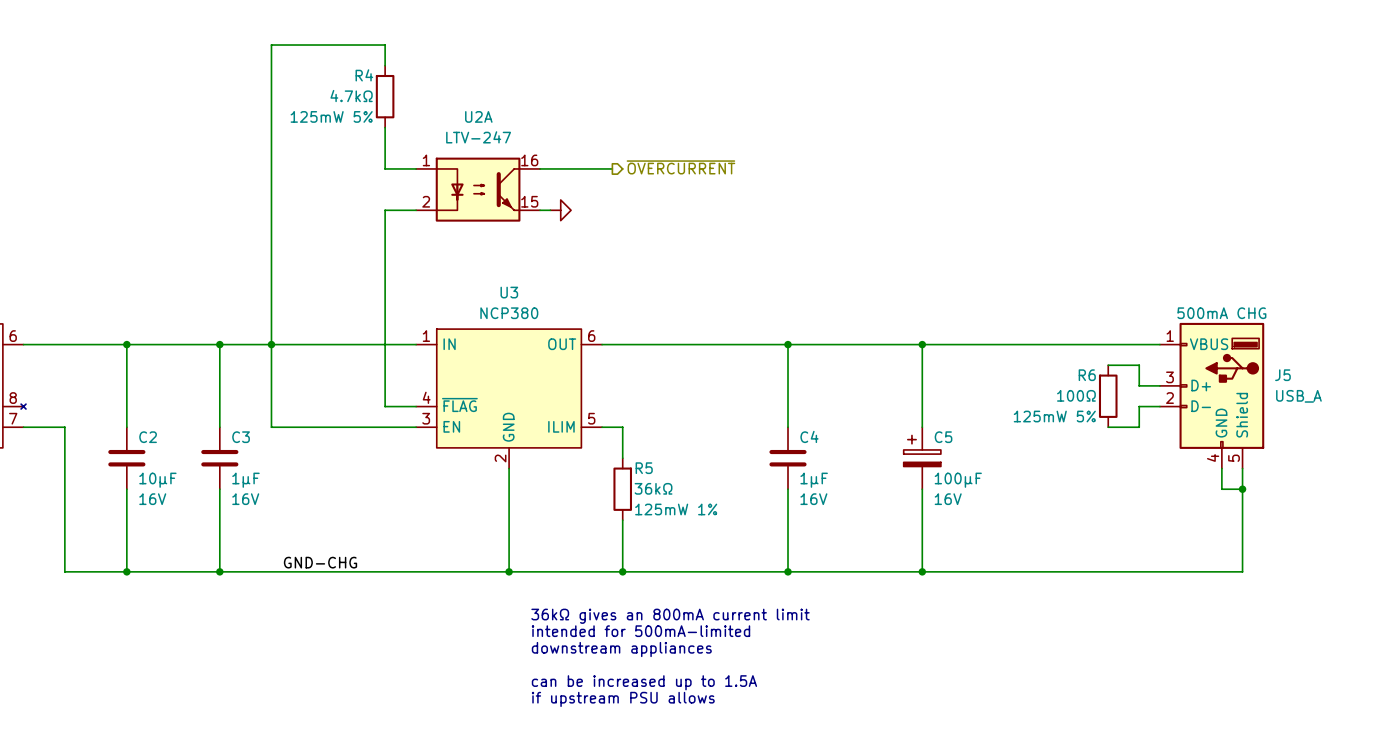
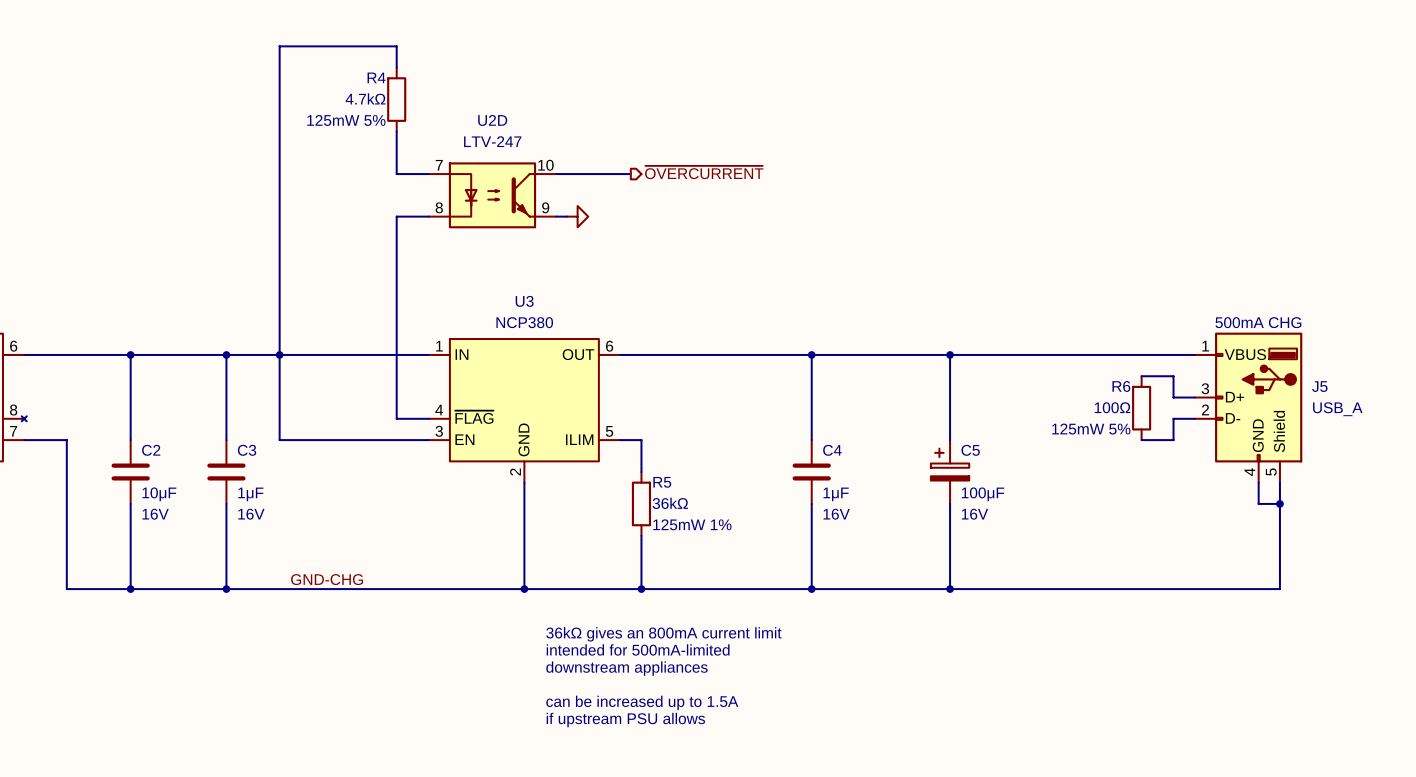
U2A name: U2A (478, 116) -> U2D (492, 120)
U2A pin number: 1 (426, 160) -> 7 (439, 165)
U2A pin number: 16 (529, 160) -> 10 (545, 165)
U2A pin number: 2 (426, 201) -> 8 (439, 207)
U2A pin number: 15 (529, 201) -> 9 (545, 207)

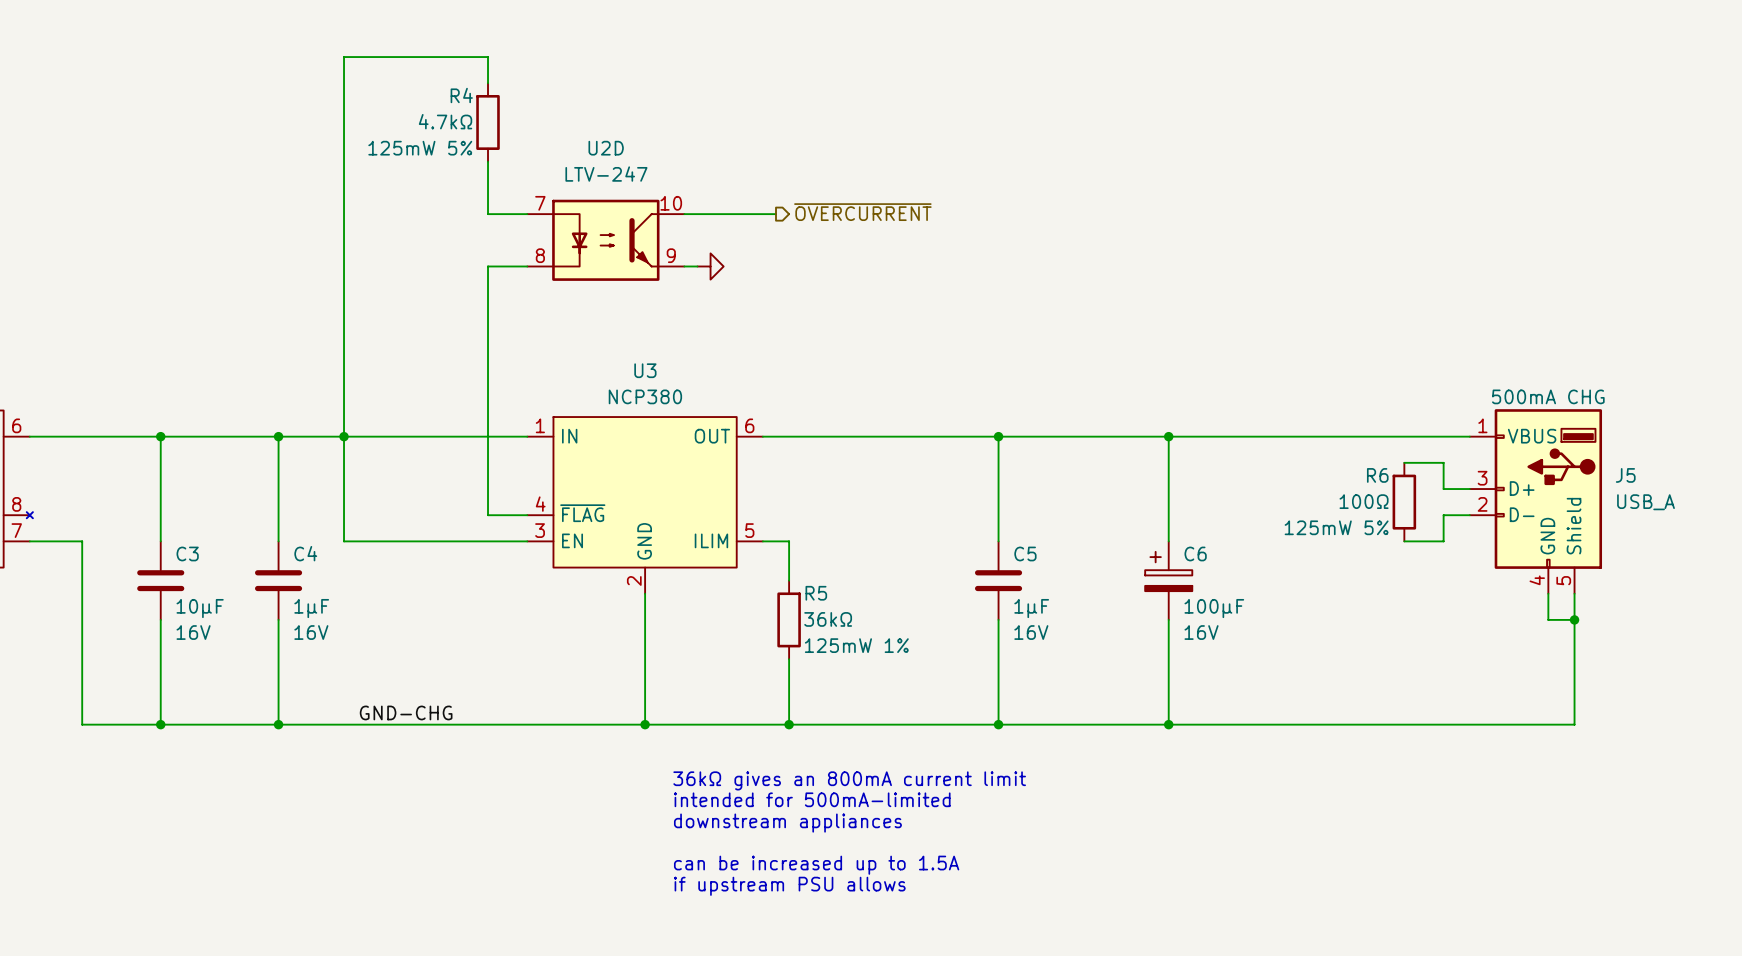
C2 name: C2 (151, 450) -> C3 (187, 553)
C3 name: C3 (247, 450) -> C4 (305, 553)
C4 name: C4 (832, 450) -> C5 (1025, 553)
C5 name: C5 (970, 450) -> C6 (1195, 553)

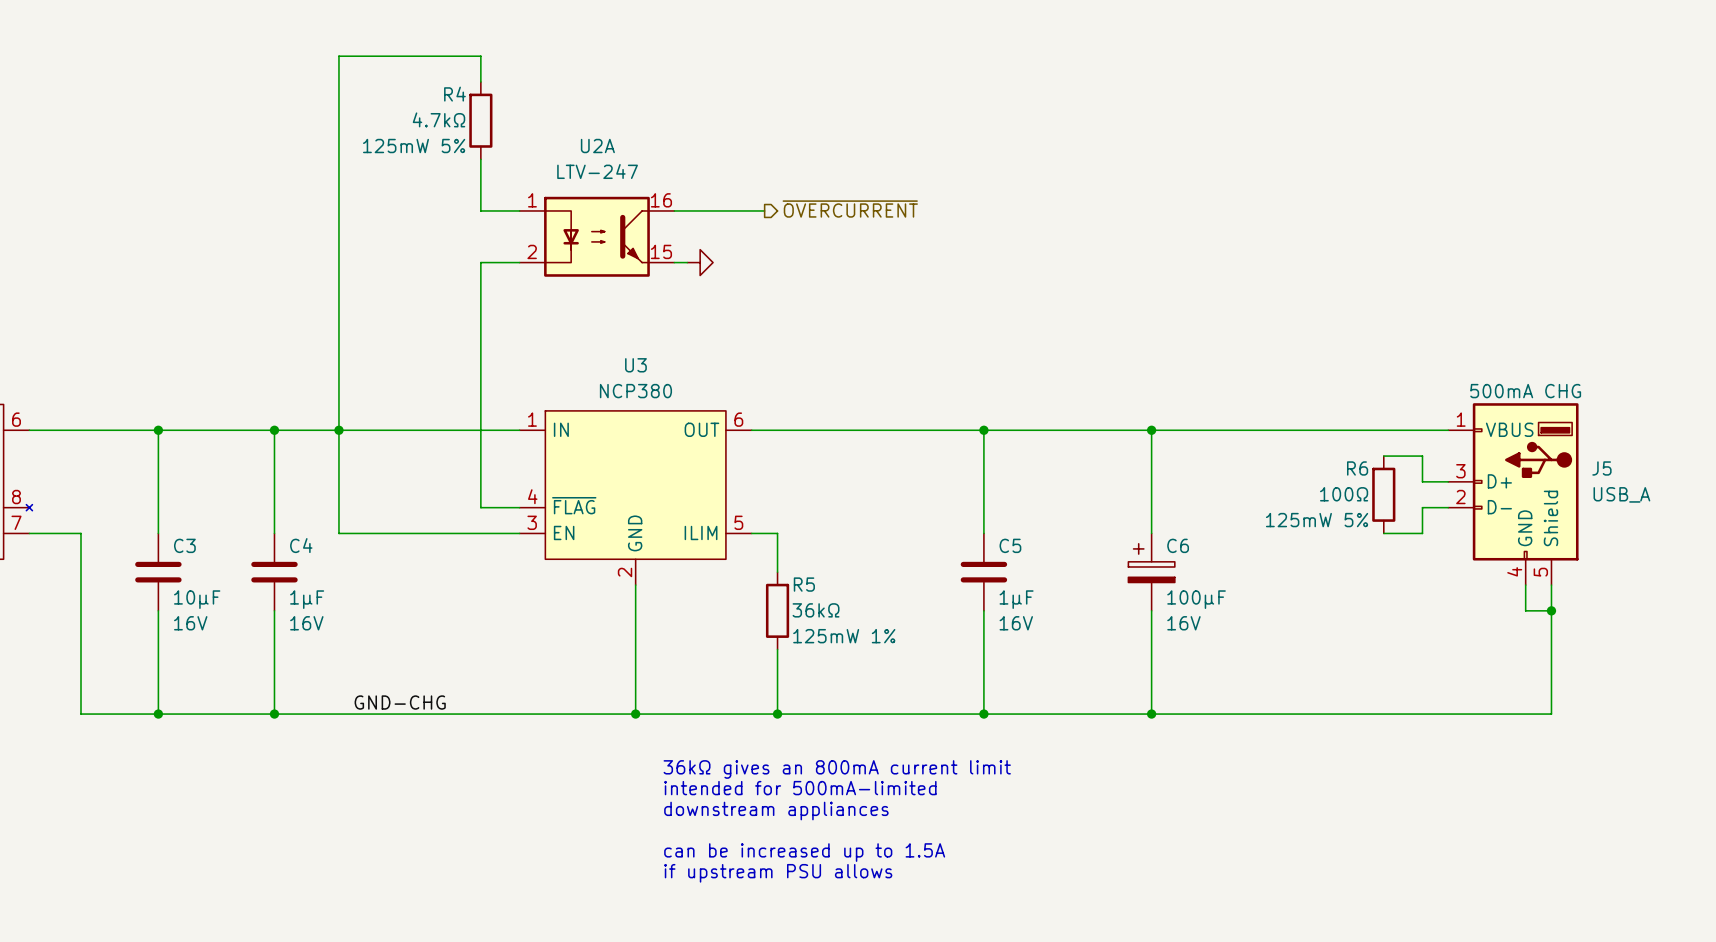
U2D name: U2D (606, 148) -> U2A (597, 146)
U2D pin number: 7 (540, 203) -> 1 (532, 200)
U2D pin number: 10 (671, 203) -> 16 (661, 200)
U2D pin number: 8 (540, 255) -> 2 (532, 251)
U2D pin number: 9 (671, 255) -> 15 (661, 251)

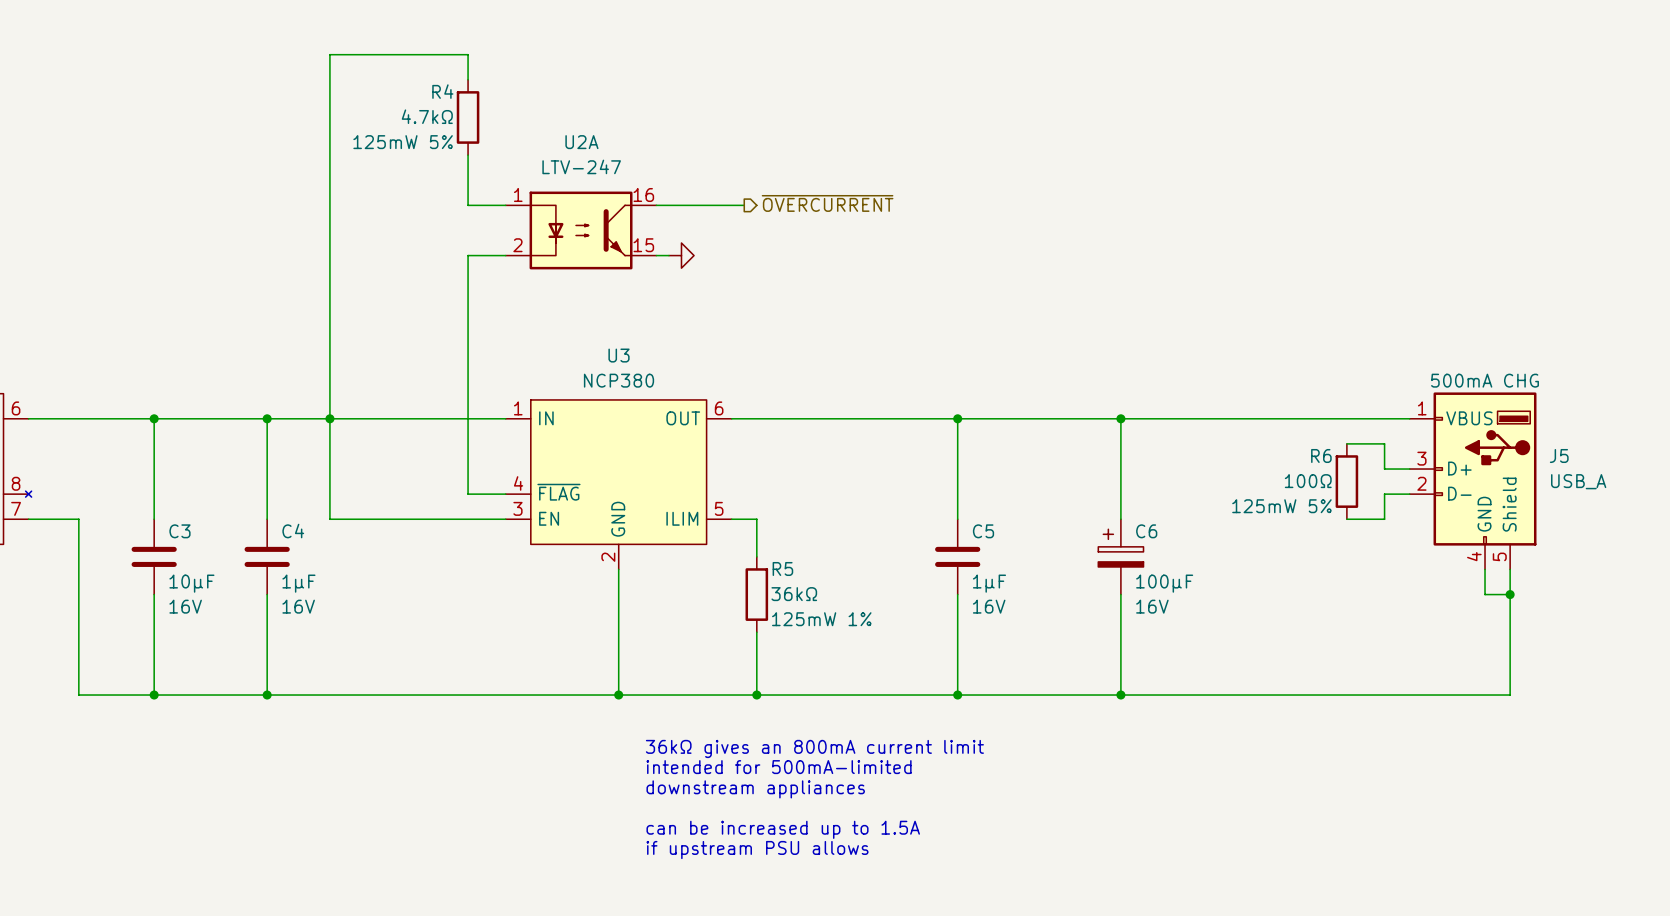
label: GND-CHG (400, 702) -> none

